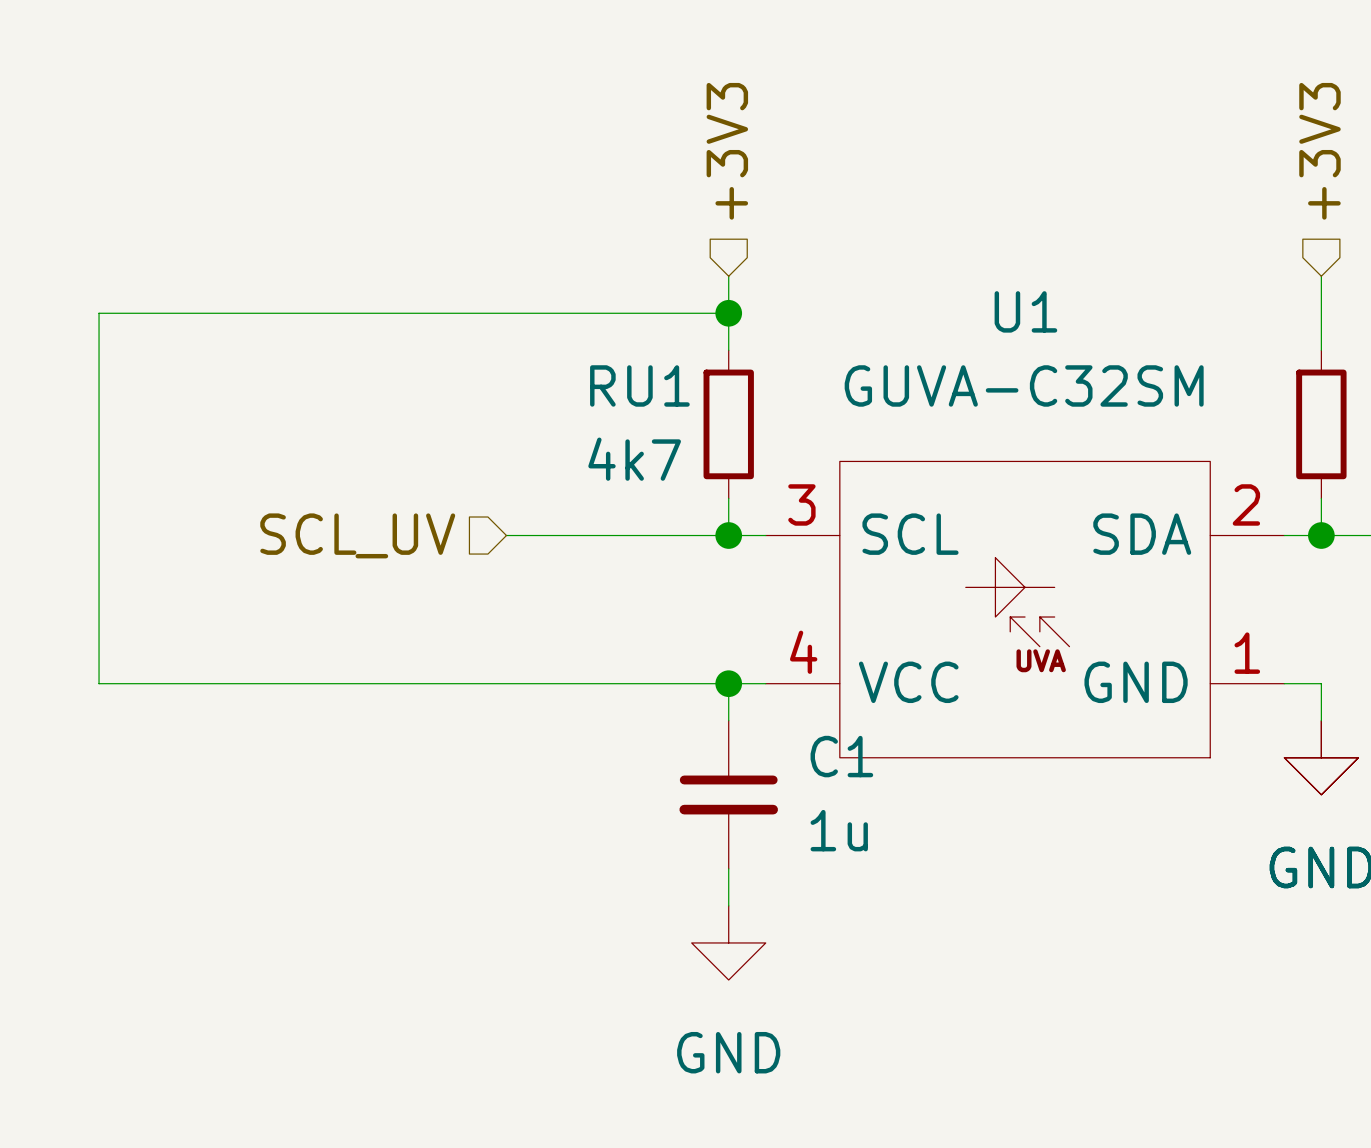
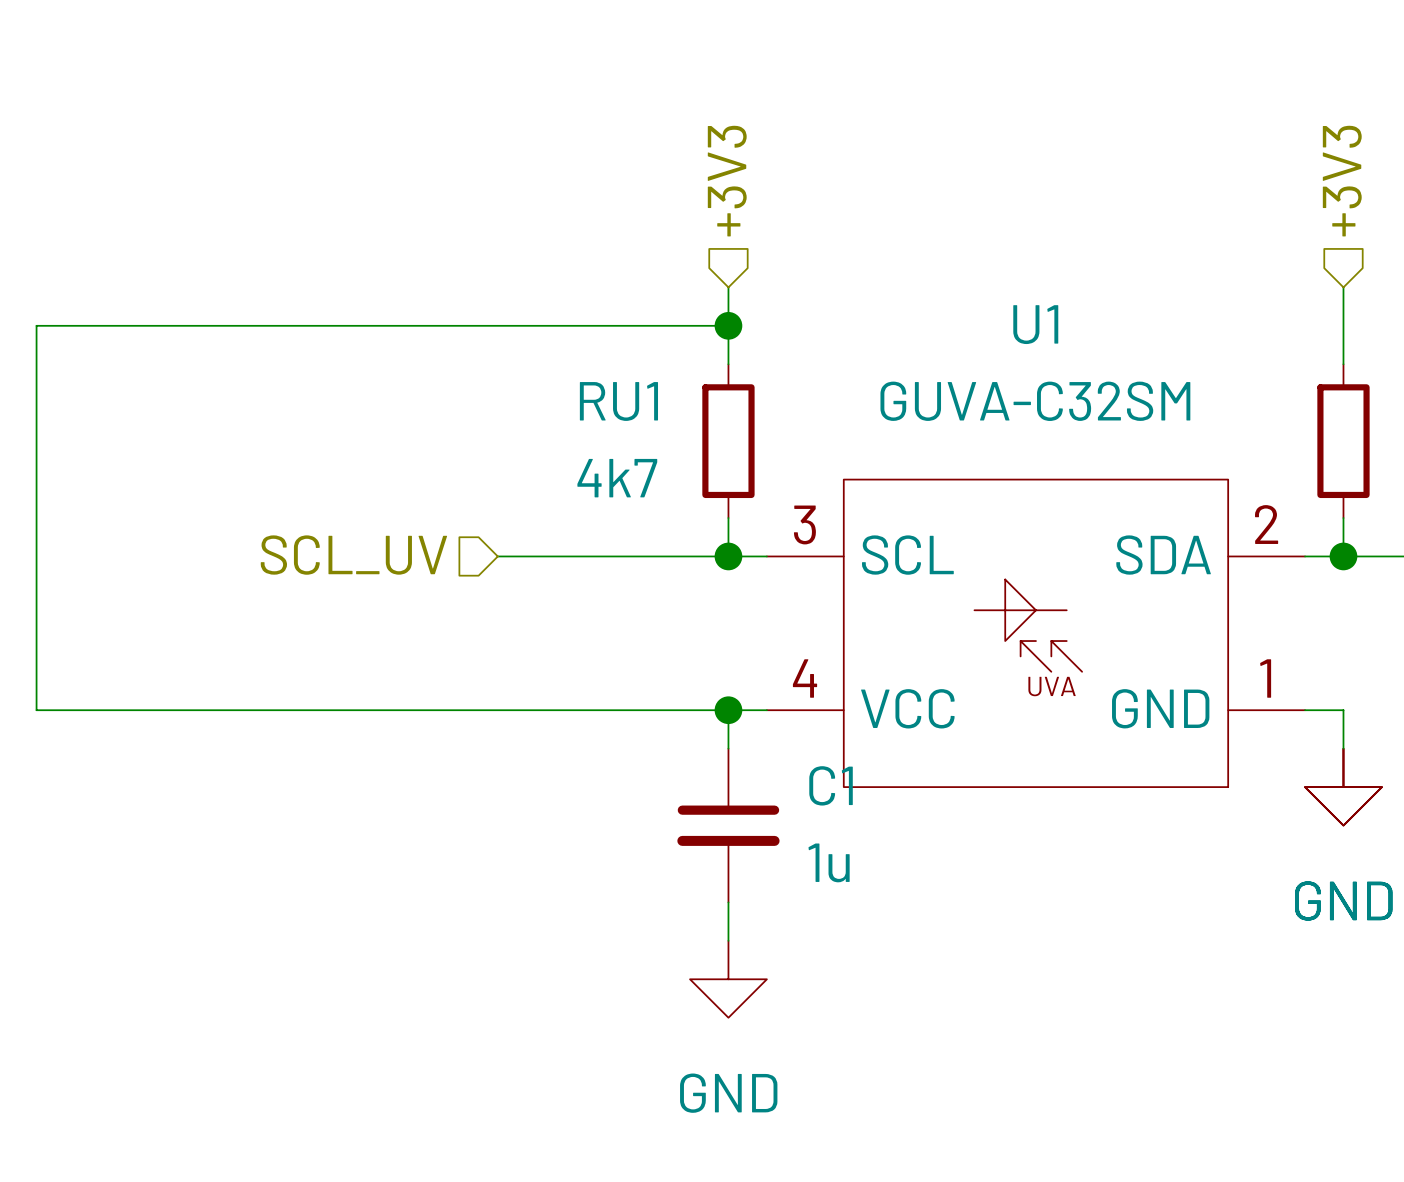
wire: (99, 313) (99, 683) -> (75, 325) (36, 325) (36, 710) (75, 710)

